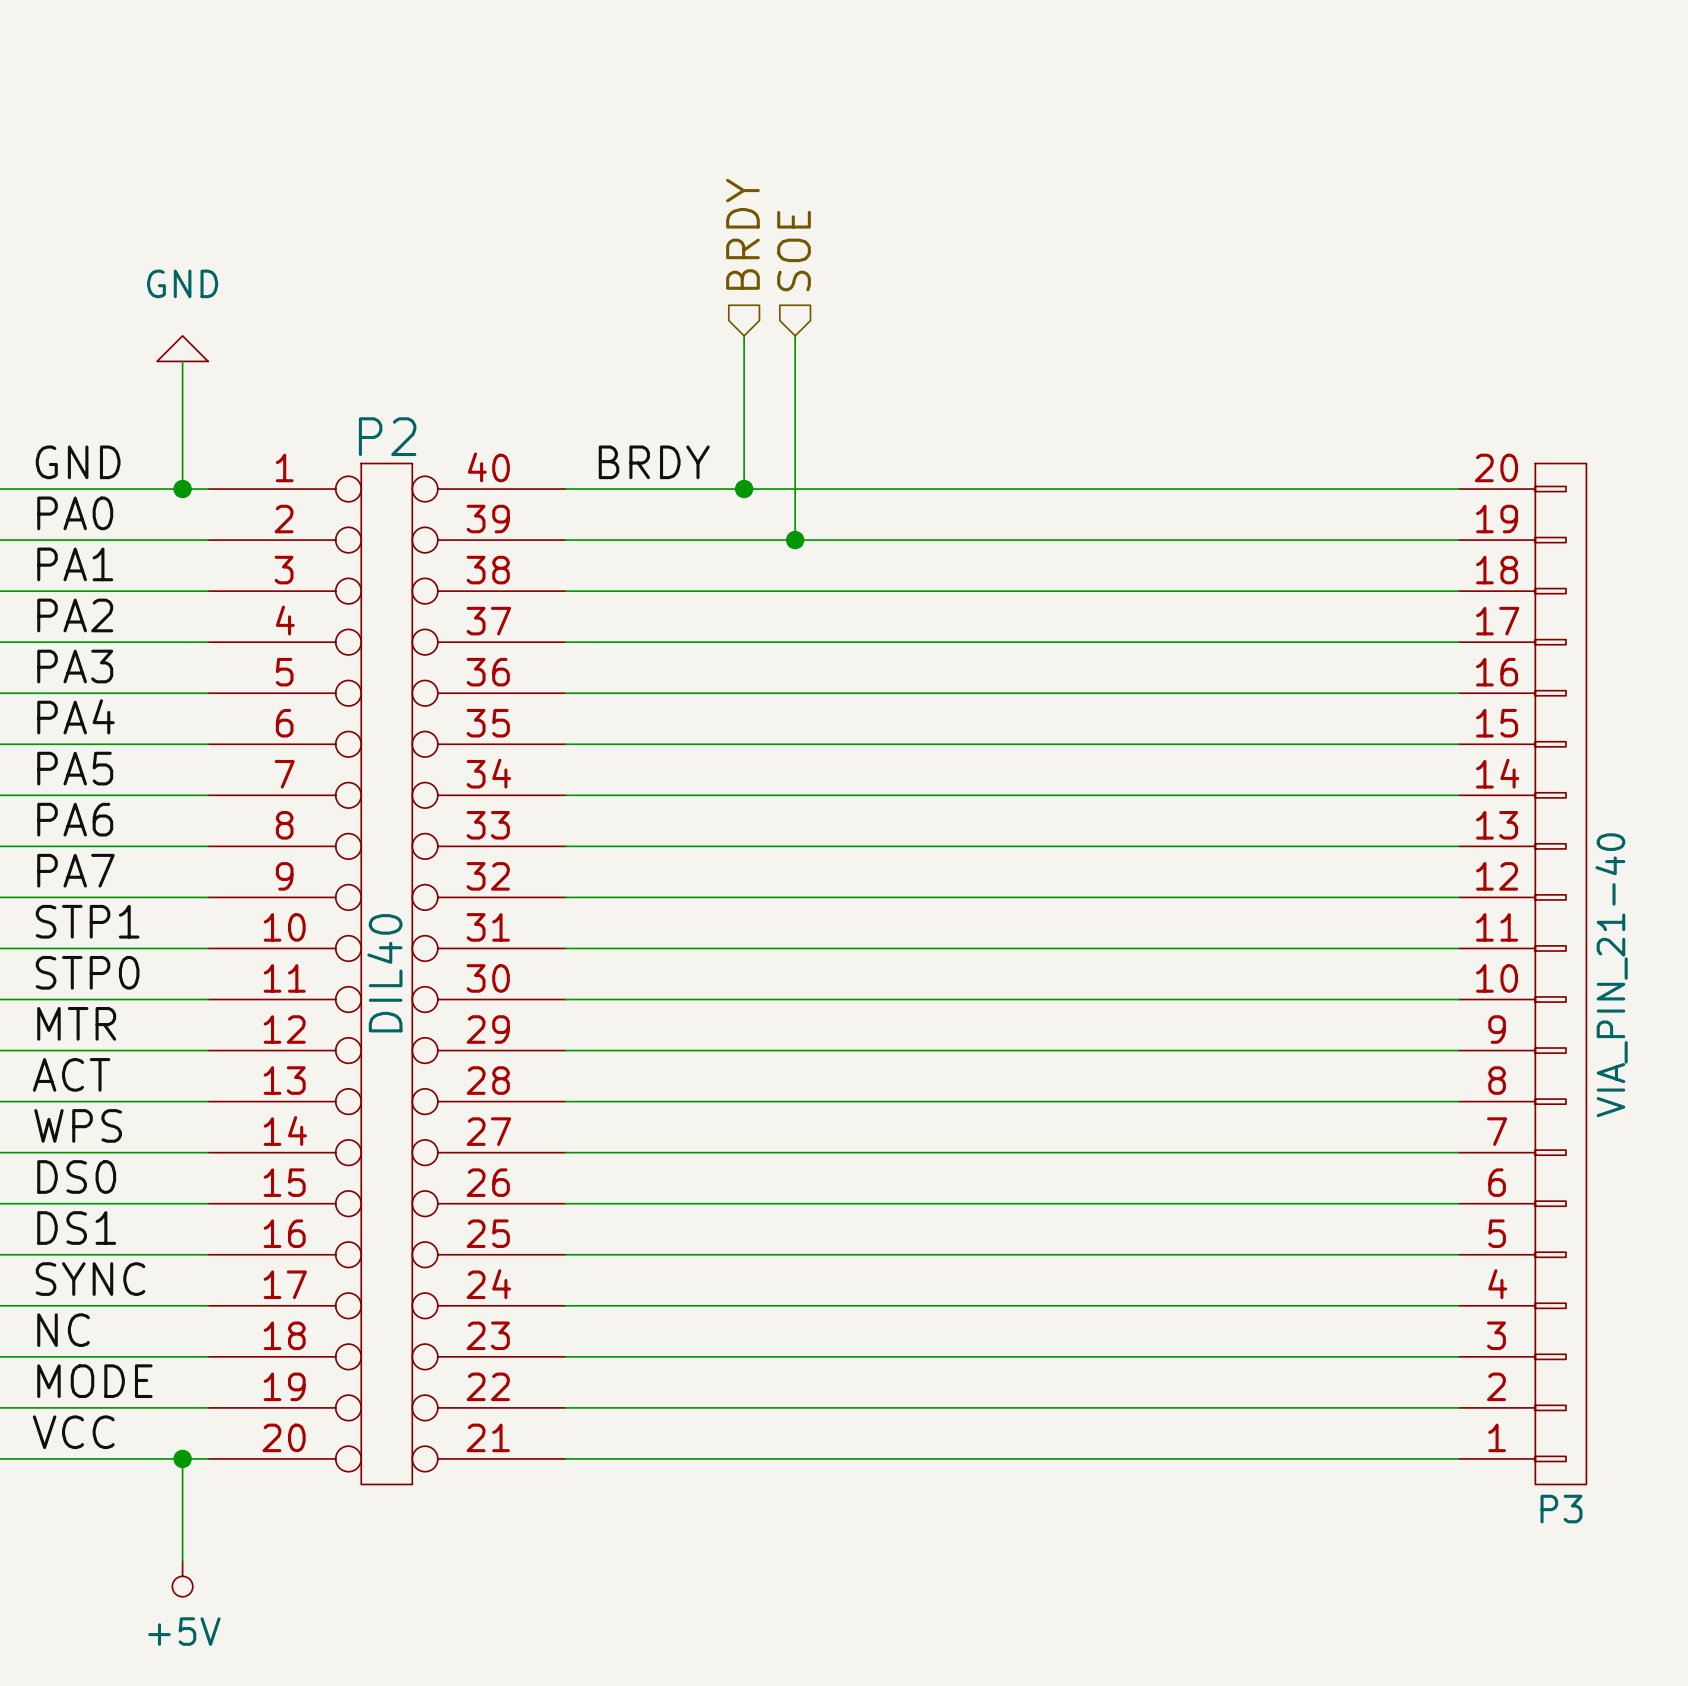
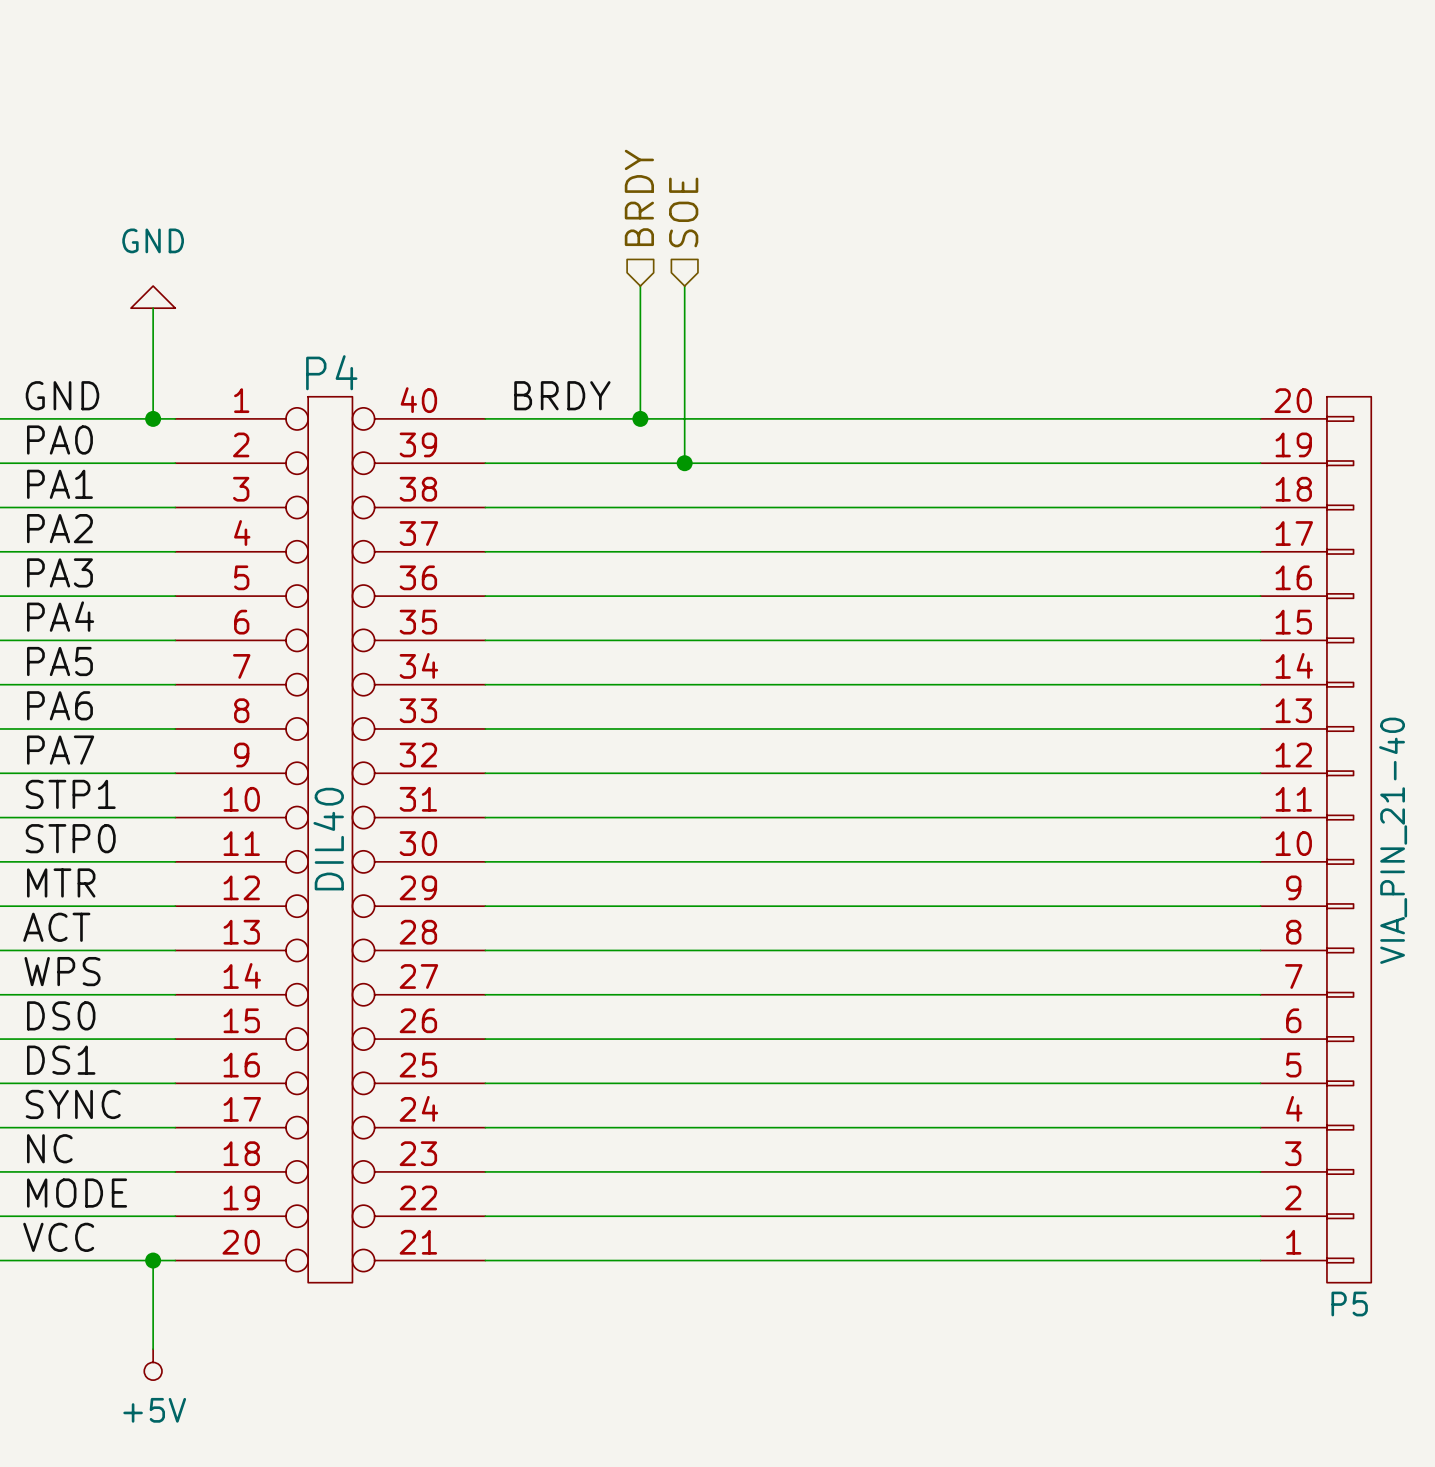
P2 name: P2 (387, 436) -> P4 (331, 372)
P3 name: P3 (1561, 1509) -> P5 (1349, 1304)

